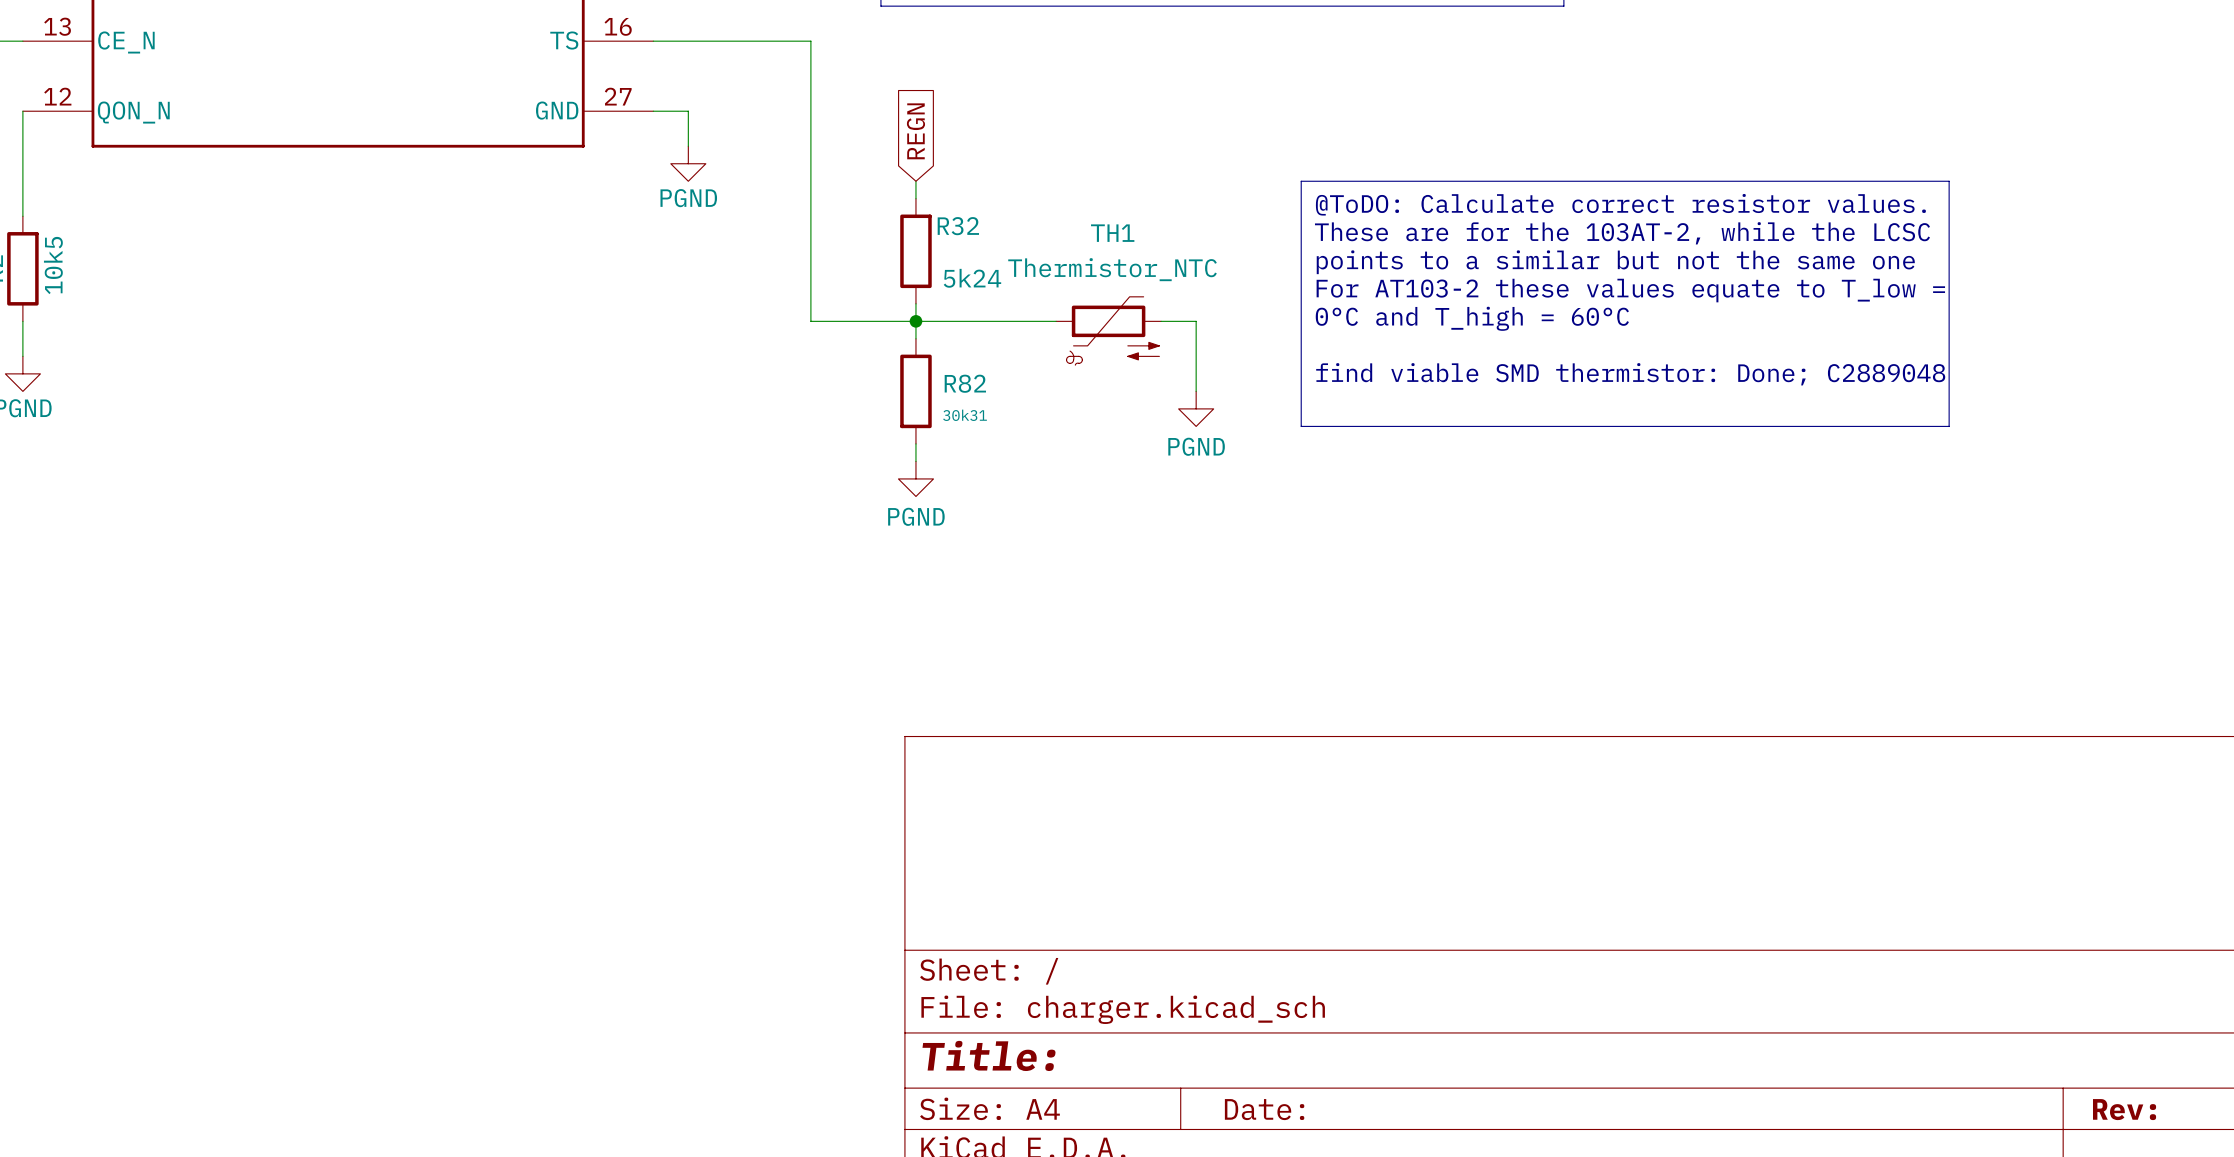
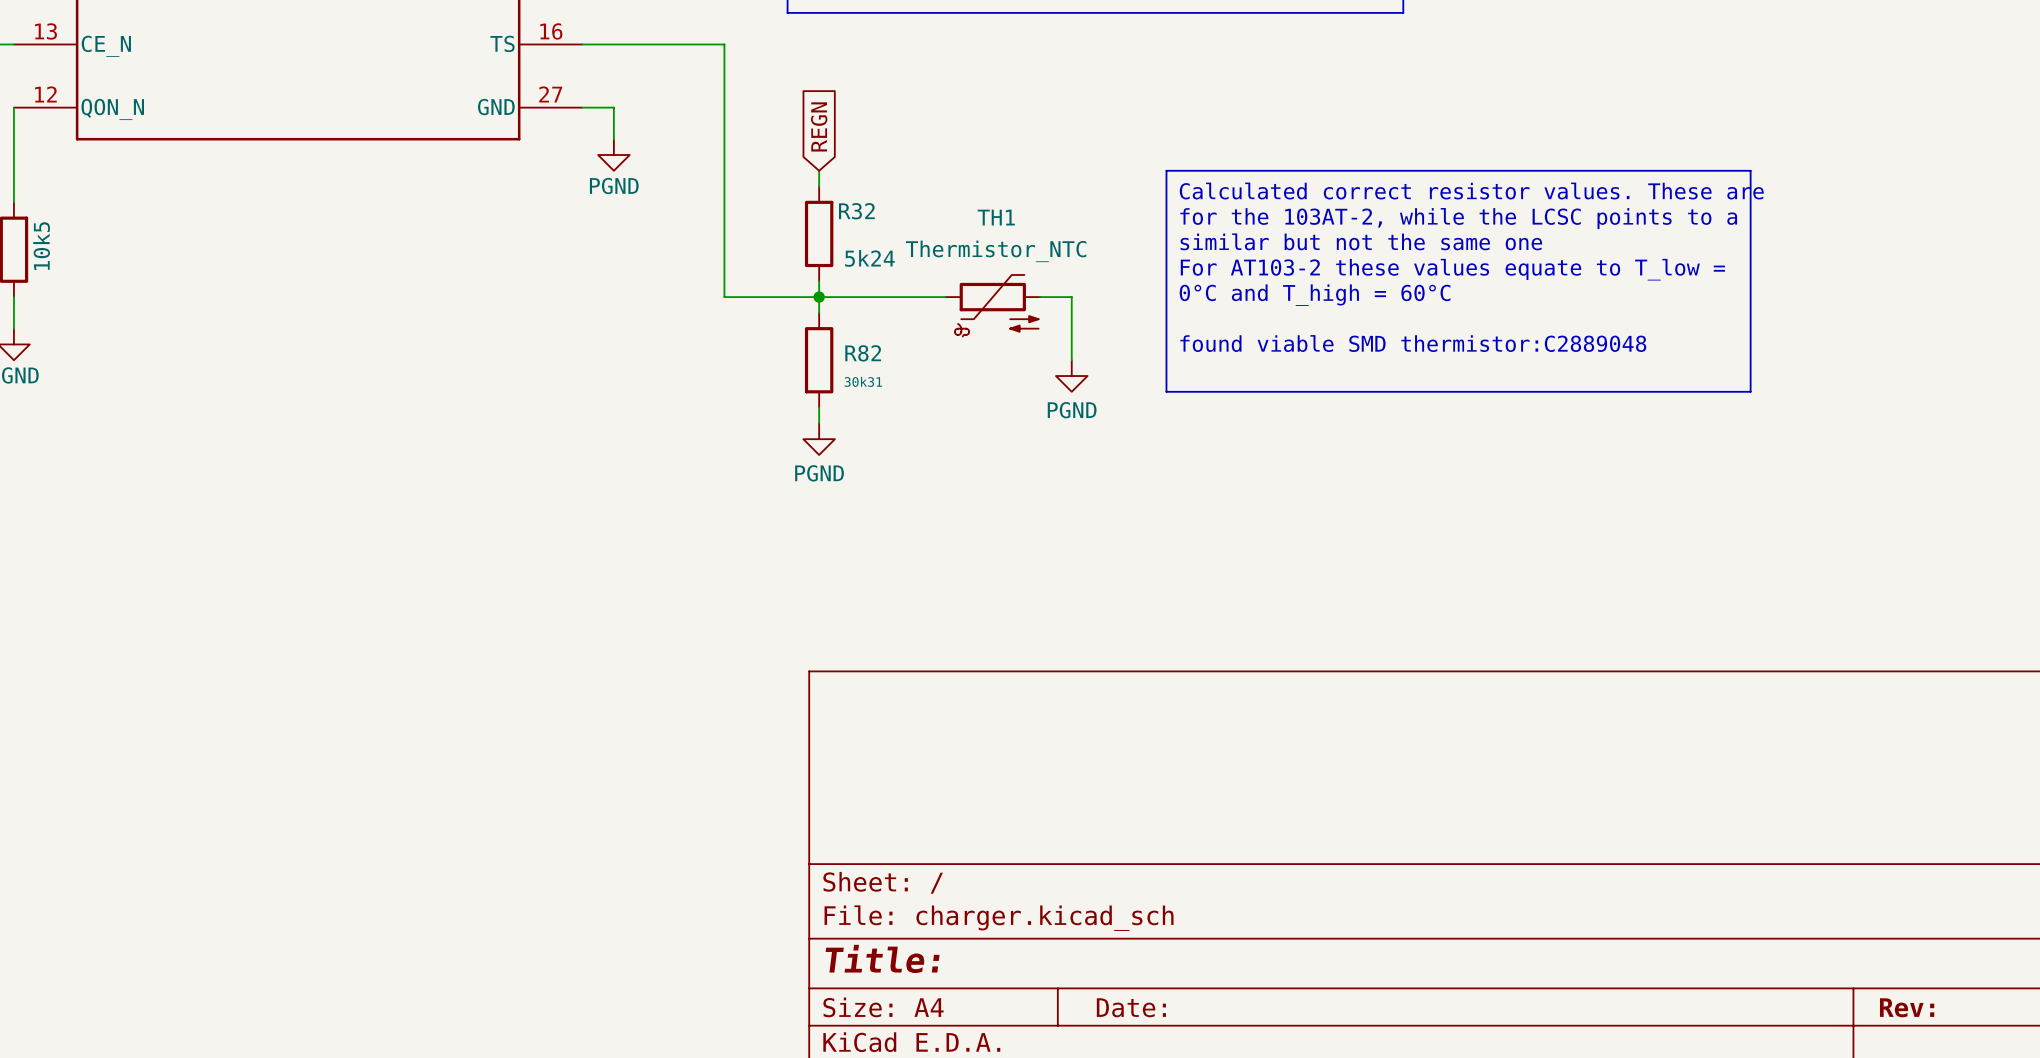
text: @ToDO: Calculate correct resistor values. (1620, 204) -> Calculated correct resistor values. These are (1471, 191)
text: These are for the 103AT-2, while the LCSC (1622, 233) -> for the 103AT-2, while the LCSC points to a (1458, 218)
text: points to a similar but not the same one (1615, 262) -> similar but not the same one (1361, 241)
text: find viable SMD thermistor: Done; C2889048 (1630, 374) -> found viable SMD thermistor:C2889048 (1413, 343)

